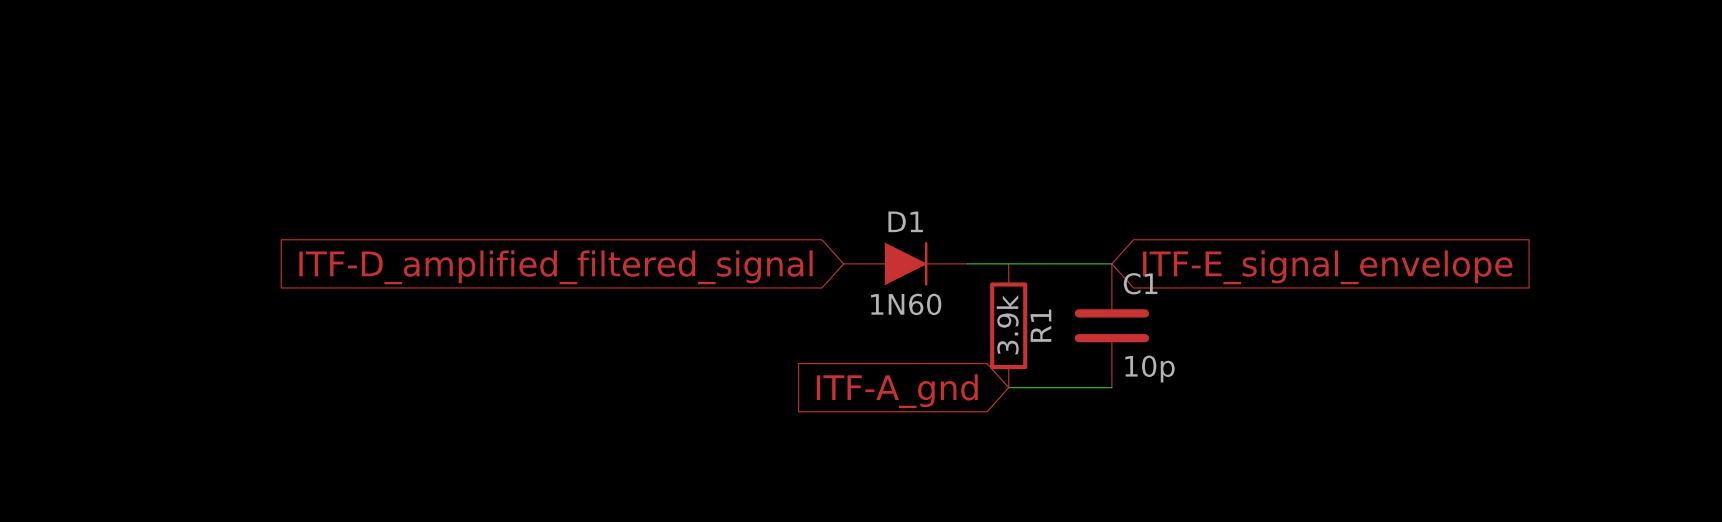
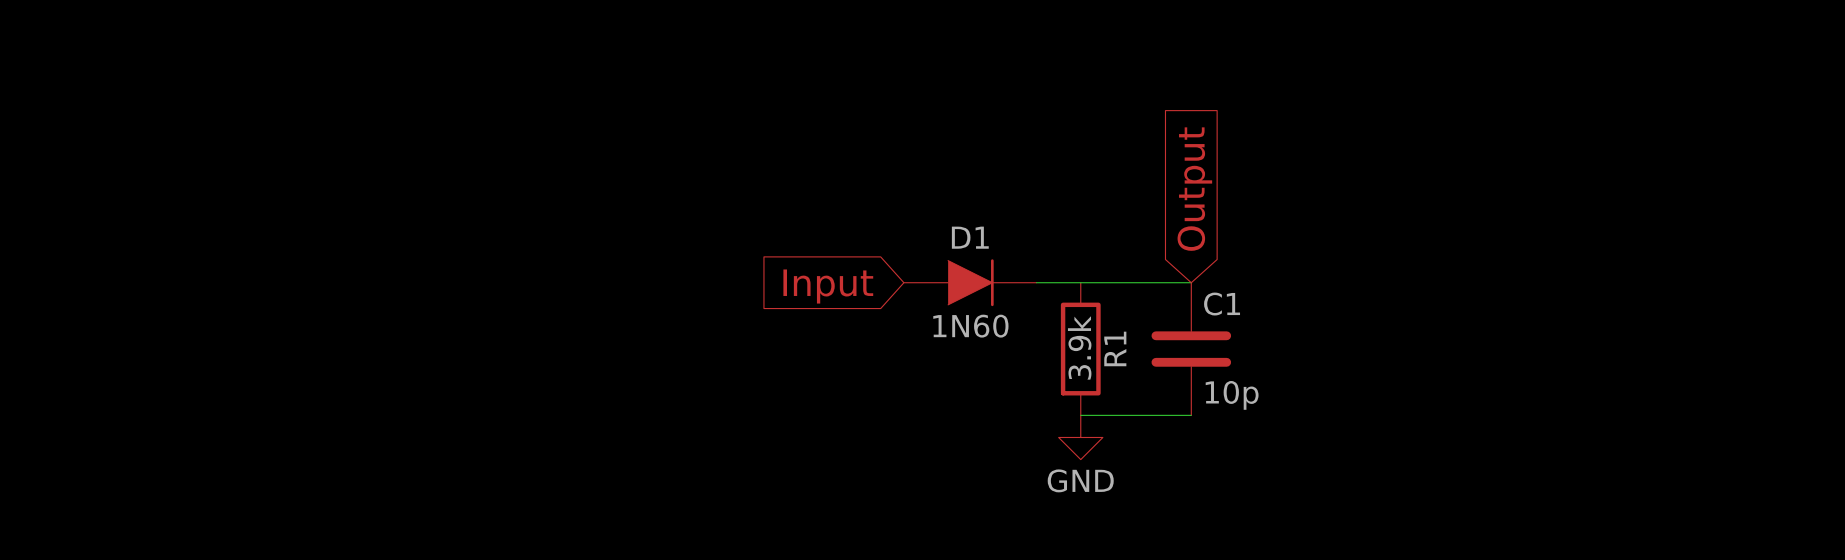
global label: ITF-D_amplified_filtered_signal (556, 267) -> Input (828, 286)
global label: ITF-E_signal_envelope (1327, 267) -> Output (1194, 189)
global label: ITF-A_gnd (897, 391) -> none
power symbol: none -> GND (1080, 437)

